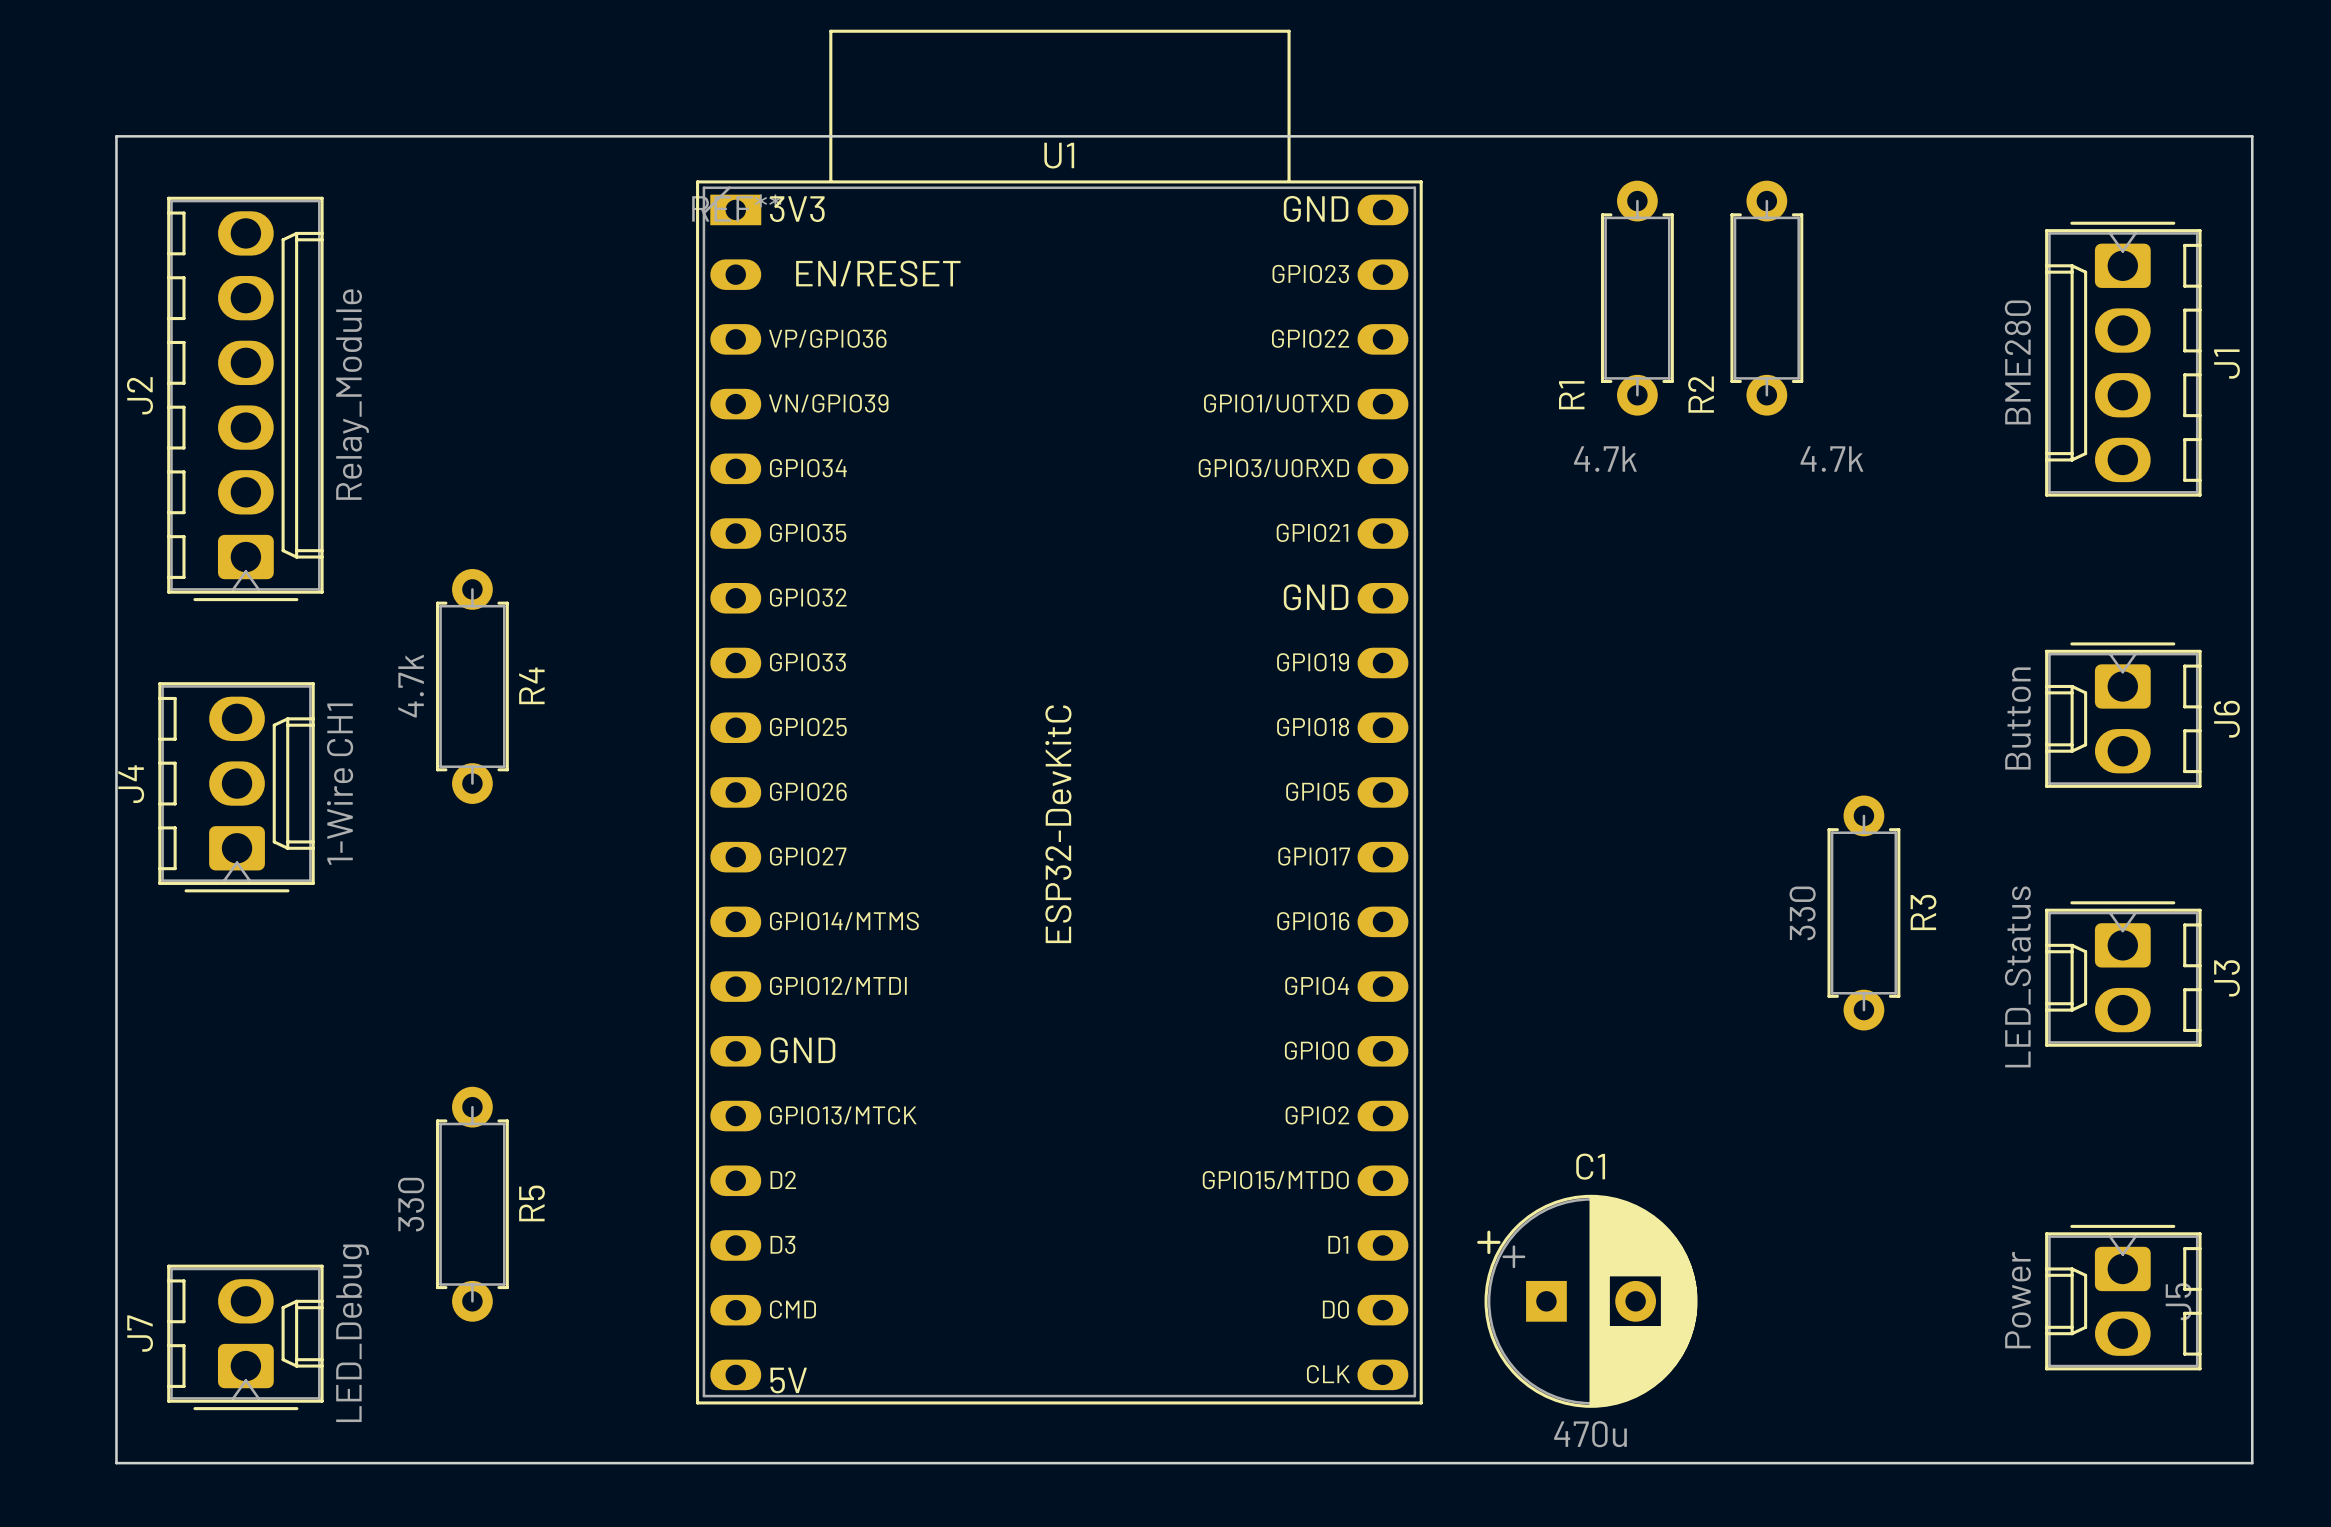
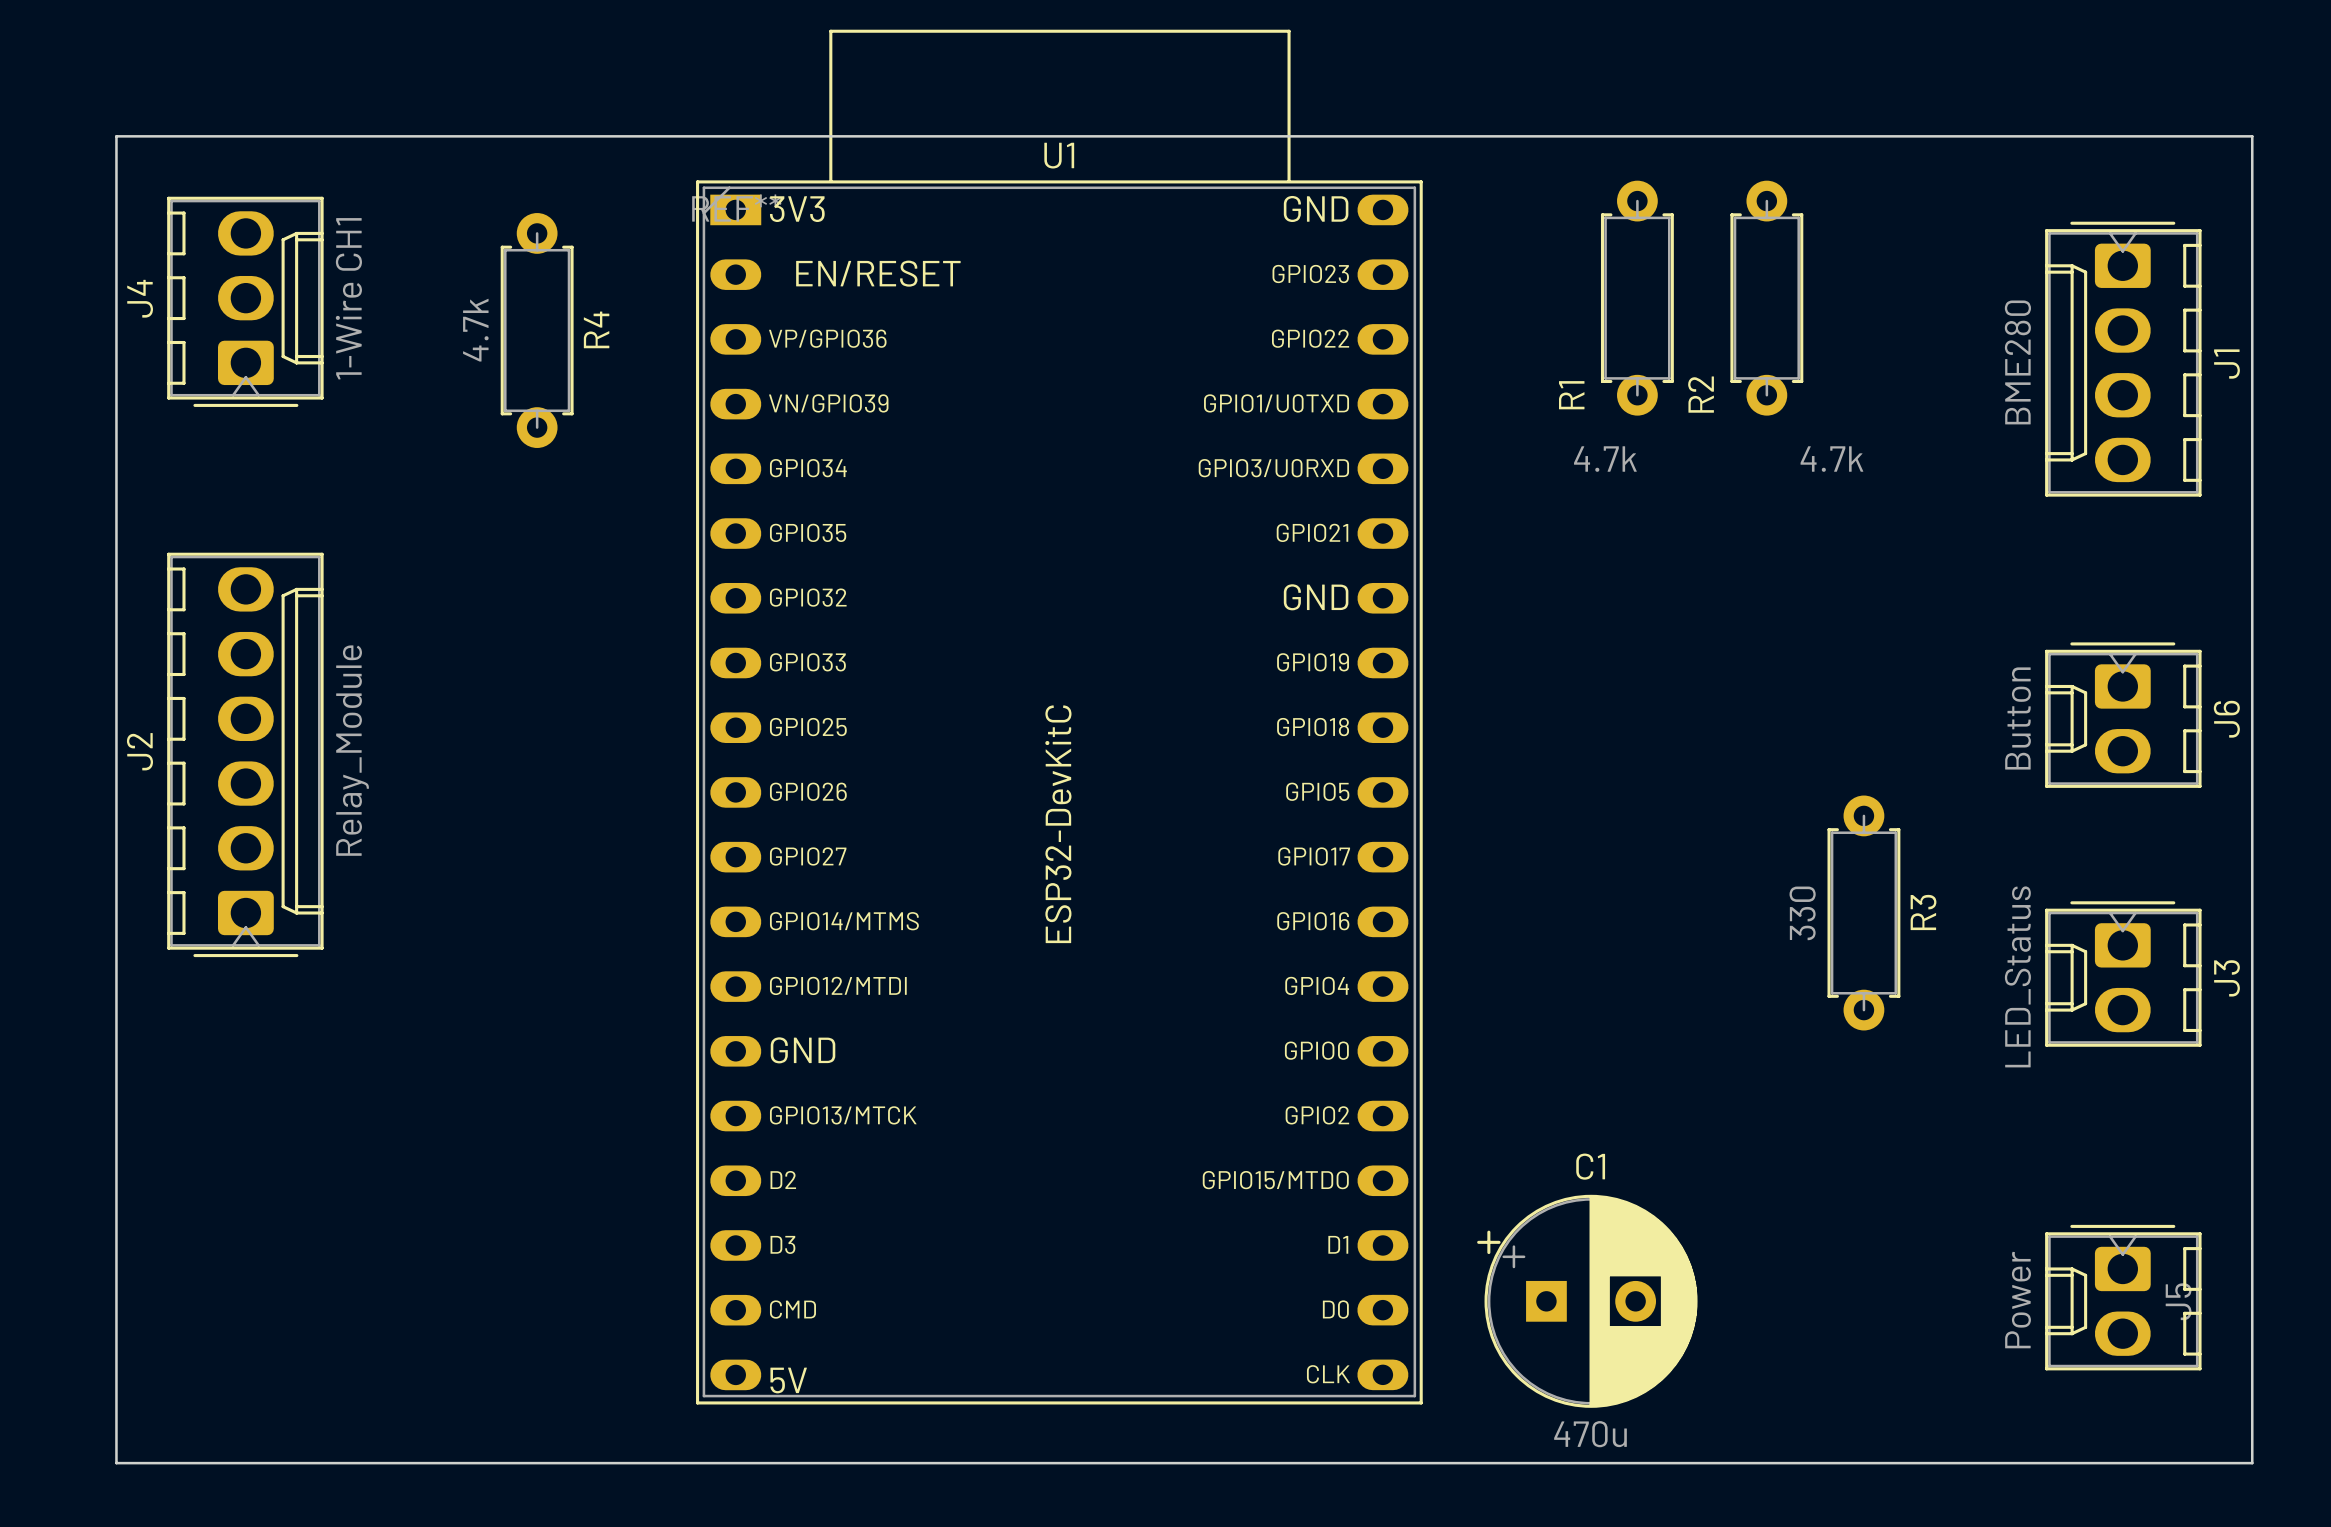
J2 position: (245, 398) -> (245, 754)
R4 position: (472, 686) -> (537, 330)
J4 position: (236, 787) -> (245, 301)
R5: 330 (472, 1204) -> none
J7: LED_Debug (245, 1337) -> none

